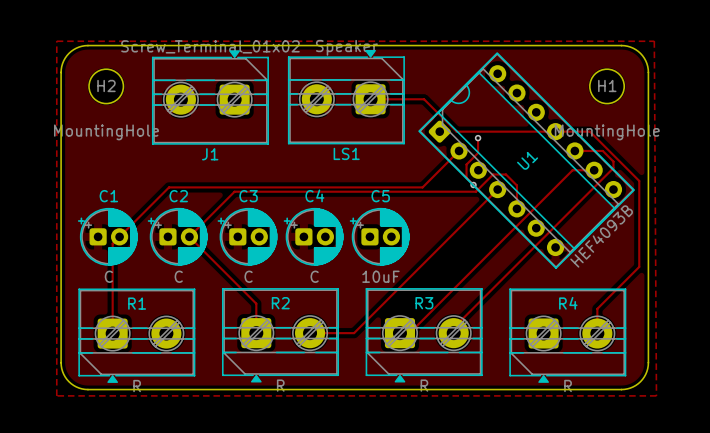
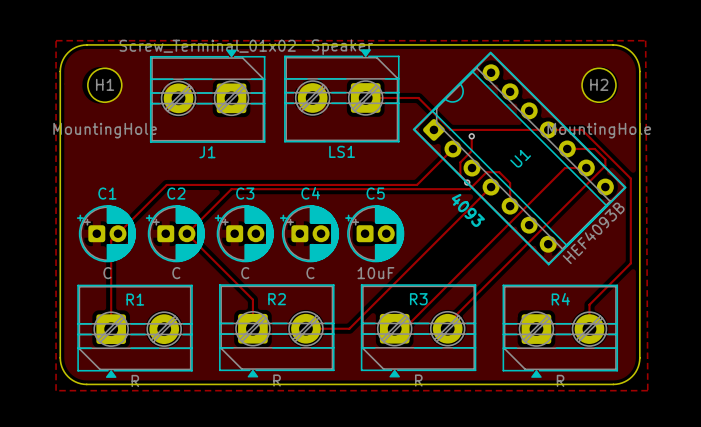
H2 name: H2 (106, 85) -> H1 (105, 84)
H1 name: H1 (607, 85) -> H2 (599, 84)
text: none -> 4093 (468, 210)

